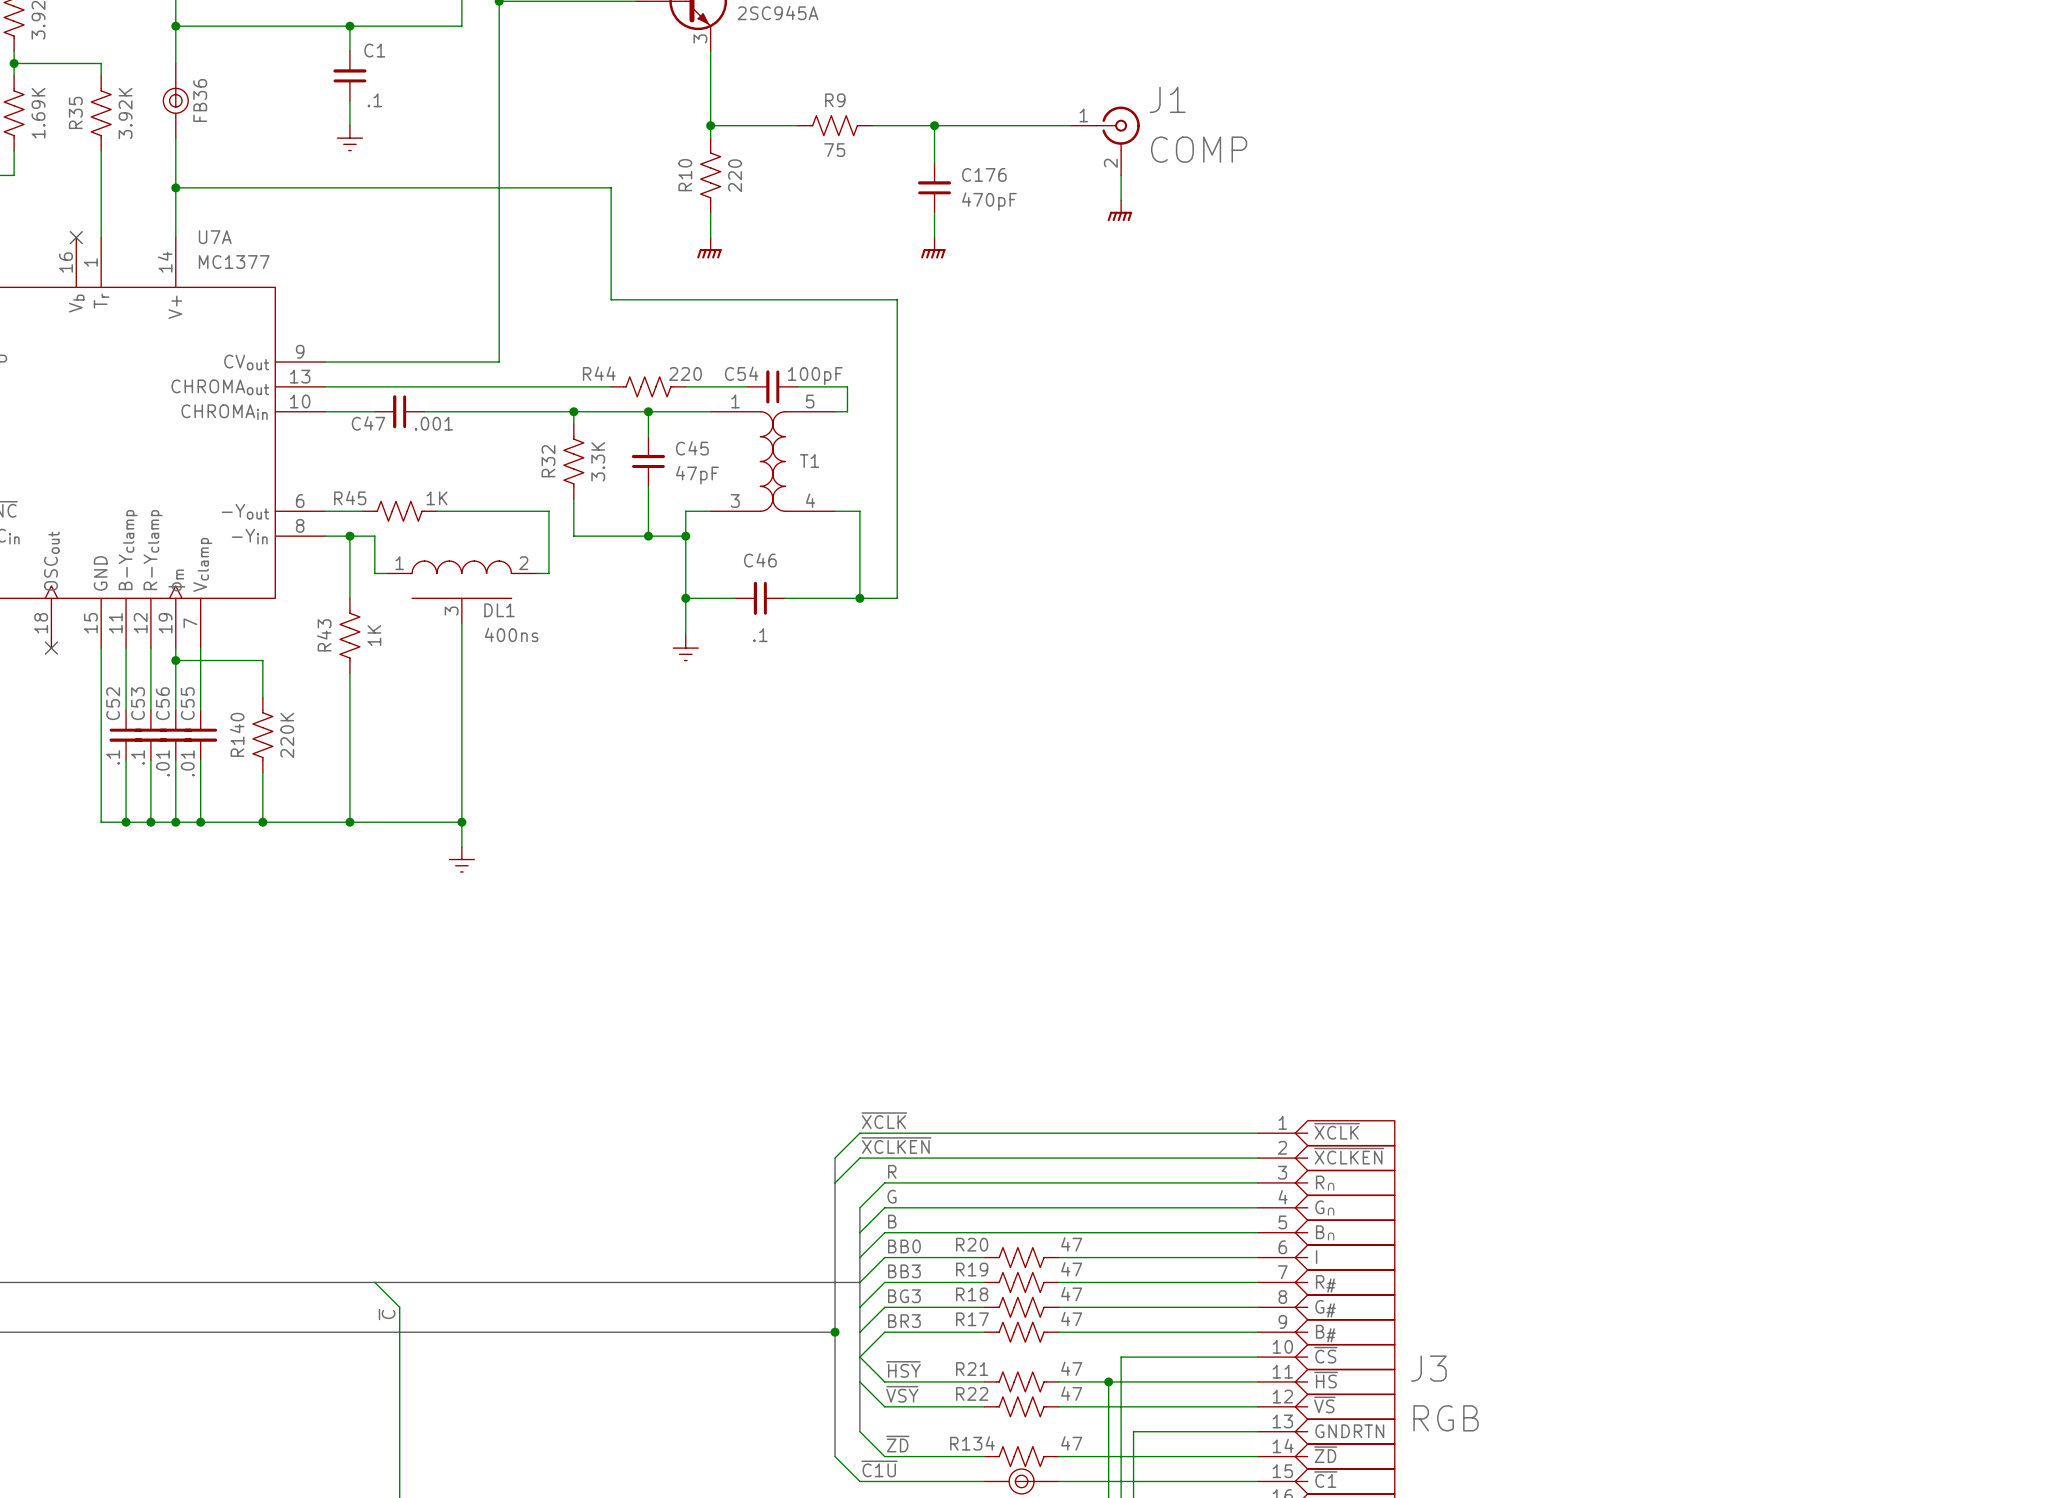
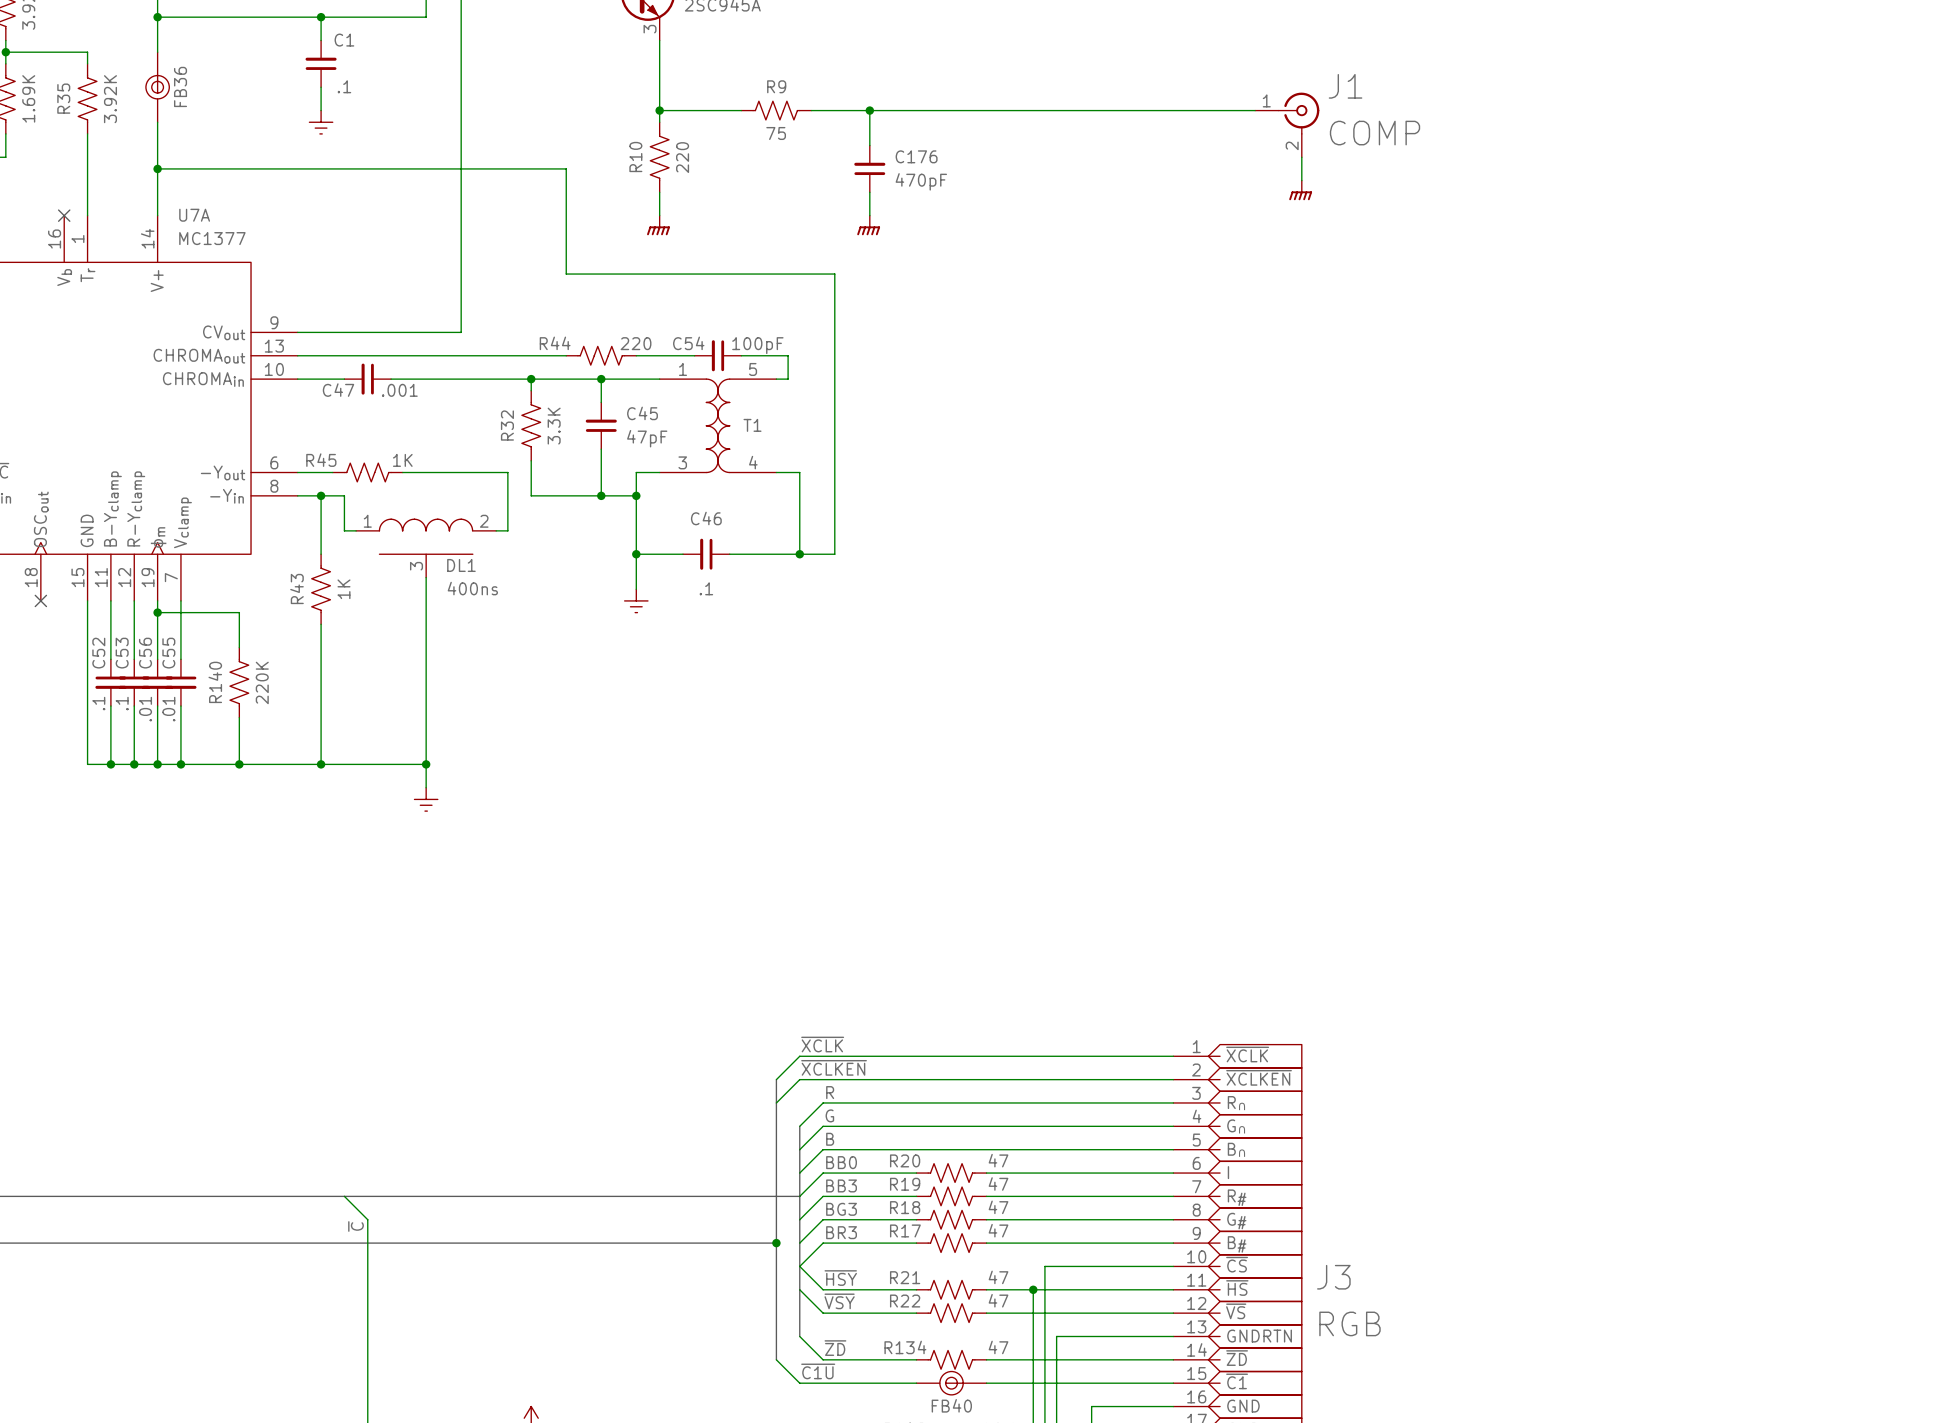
wire: none -> (998, 110) (1255, 110)
J1 position: (1105, 140) -> (1287, 124)
wire: (1121, 175) (1121, 200) -> none
wire: none -> (1301, 157) (1301, 180)
power symbol: (1119, 210) -> none
power symbol: none -> (1300, 190)

